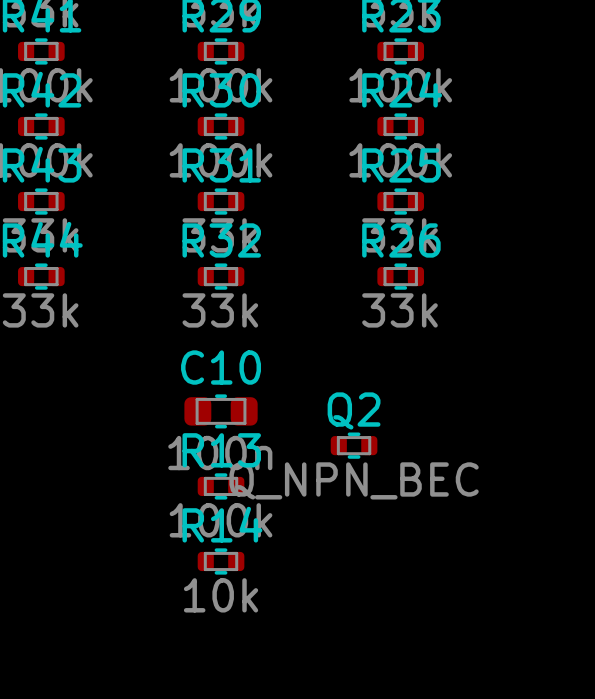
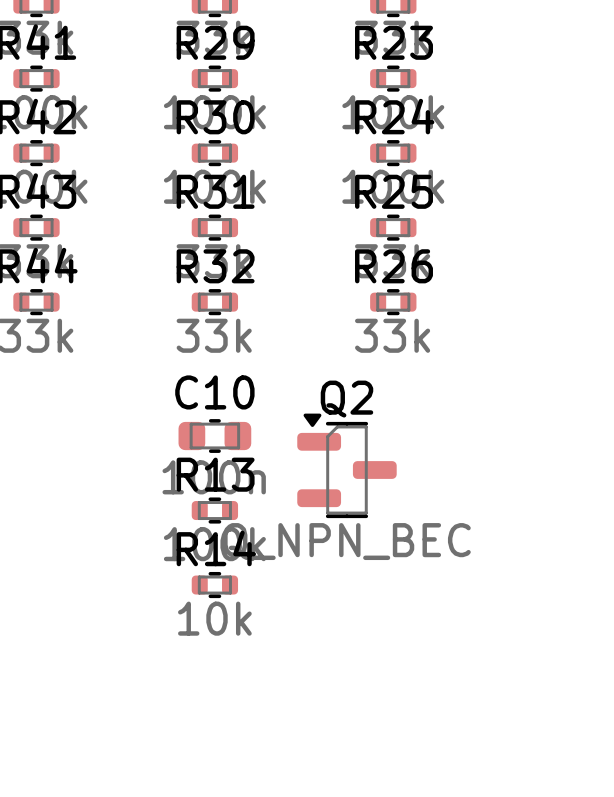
Q2 footprint: [330, 432, 378, 459] -> [297, 413, 397, 519]

